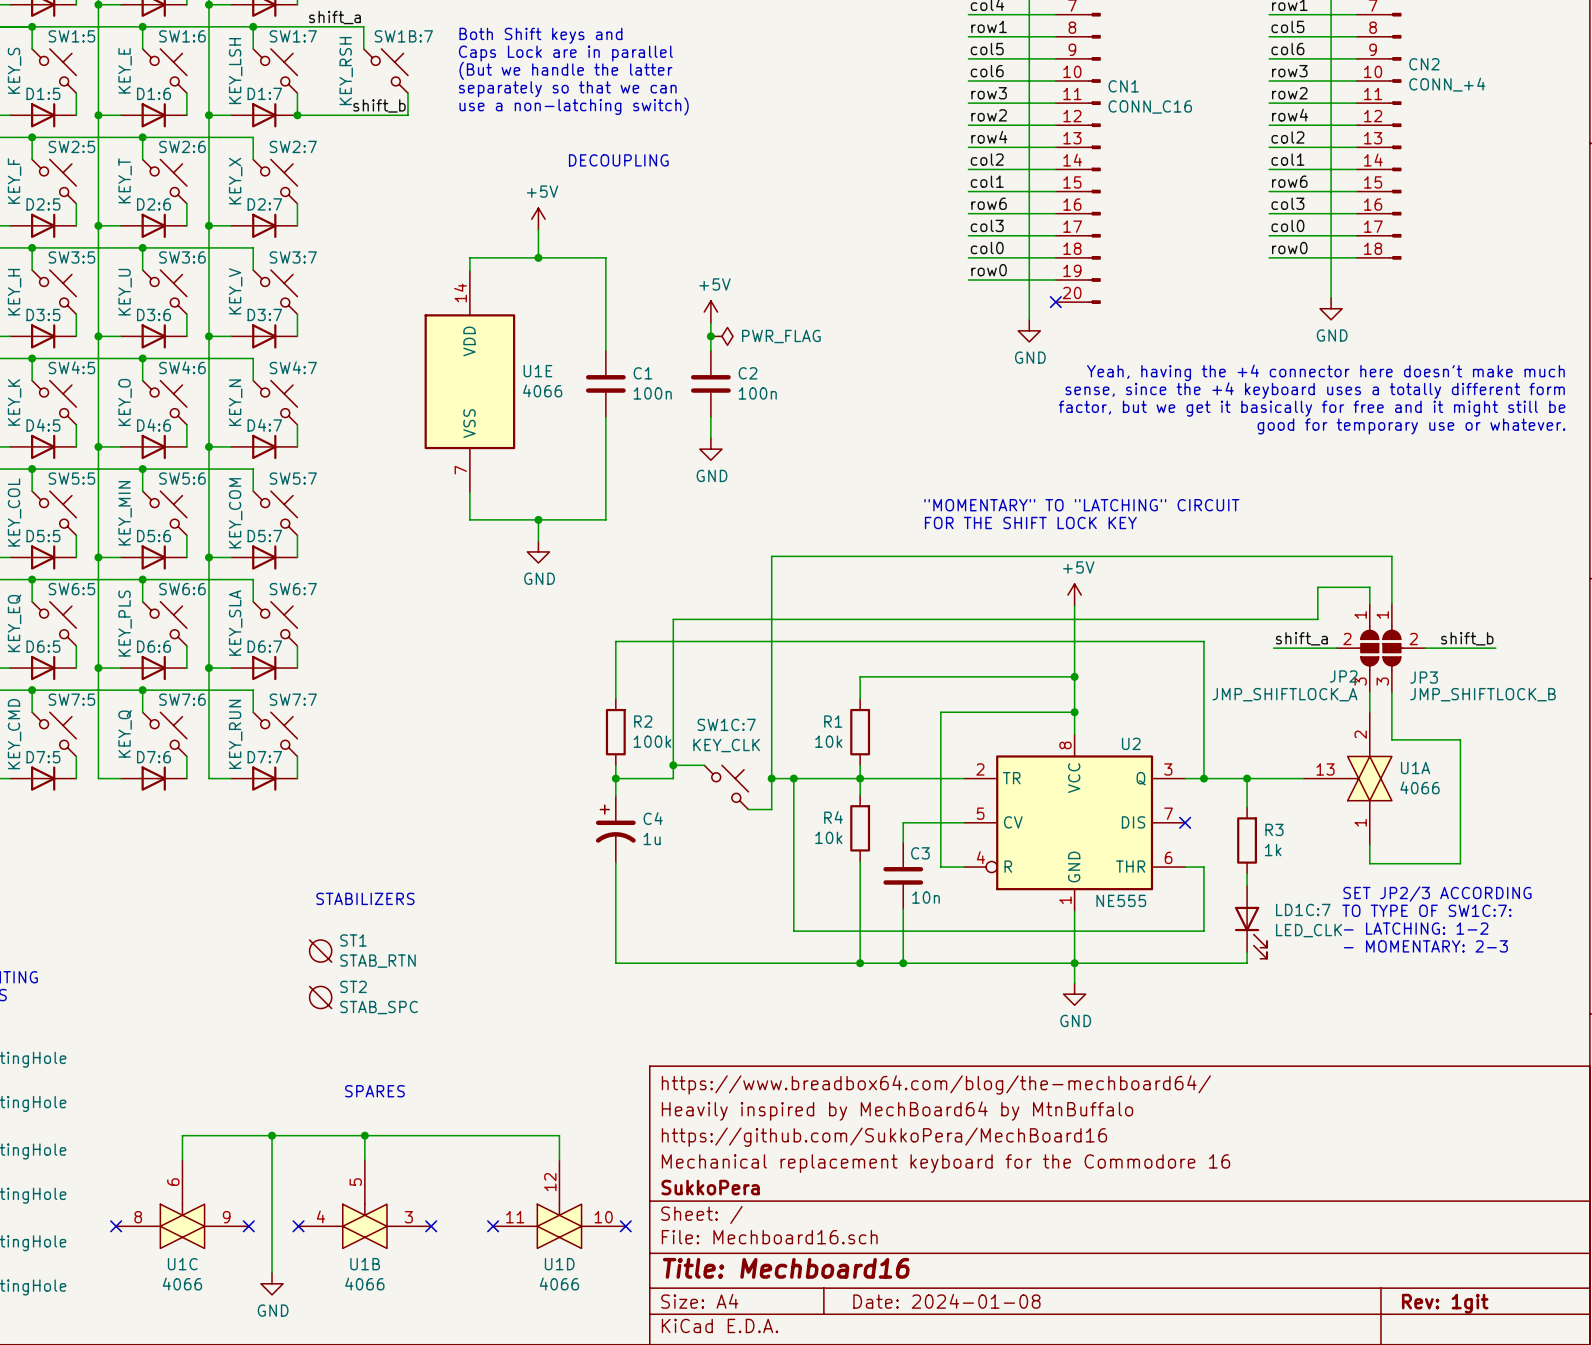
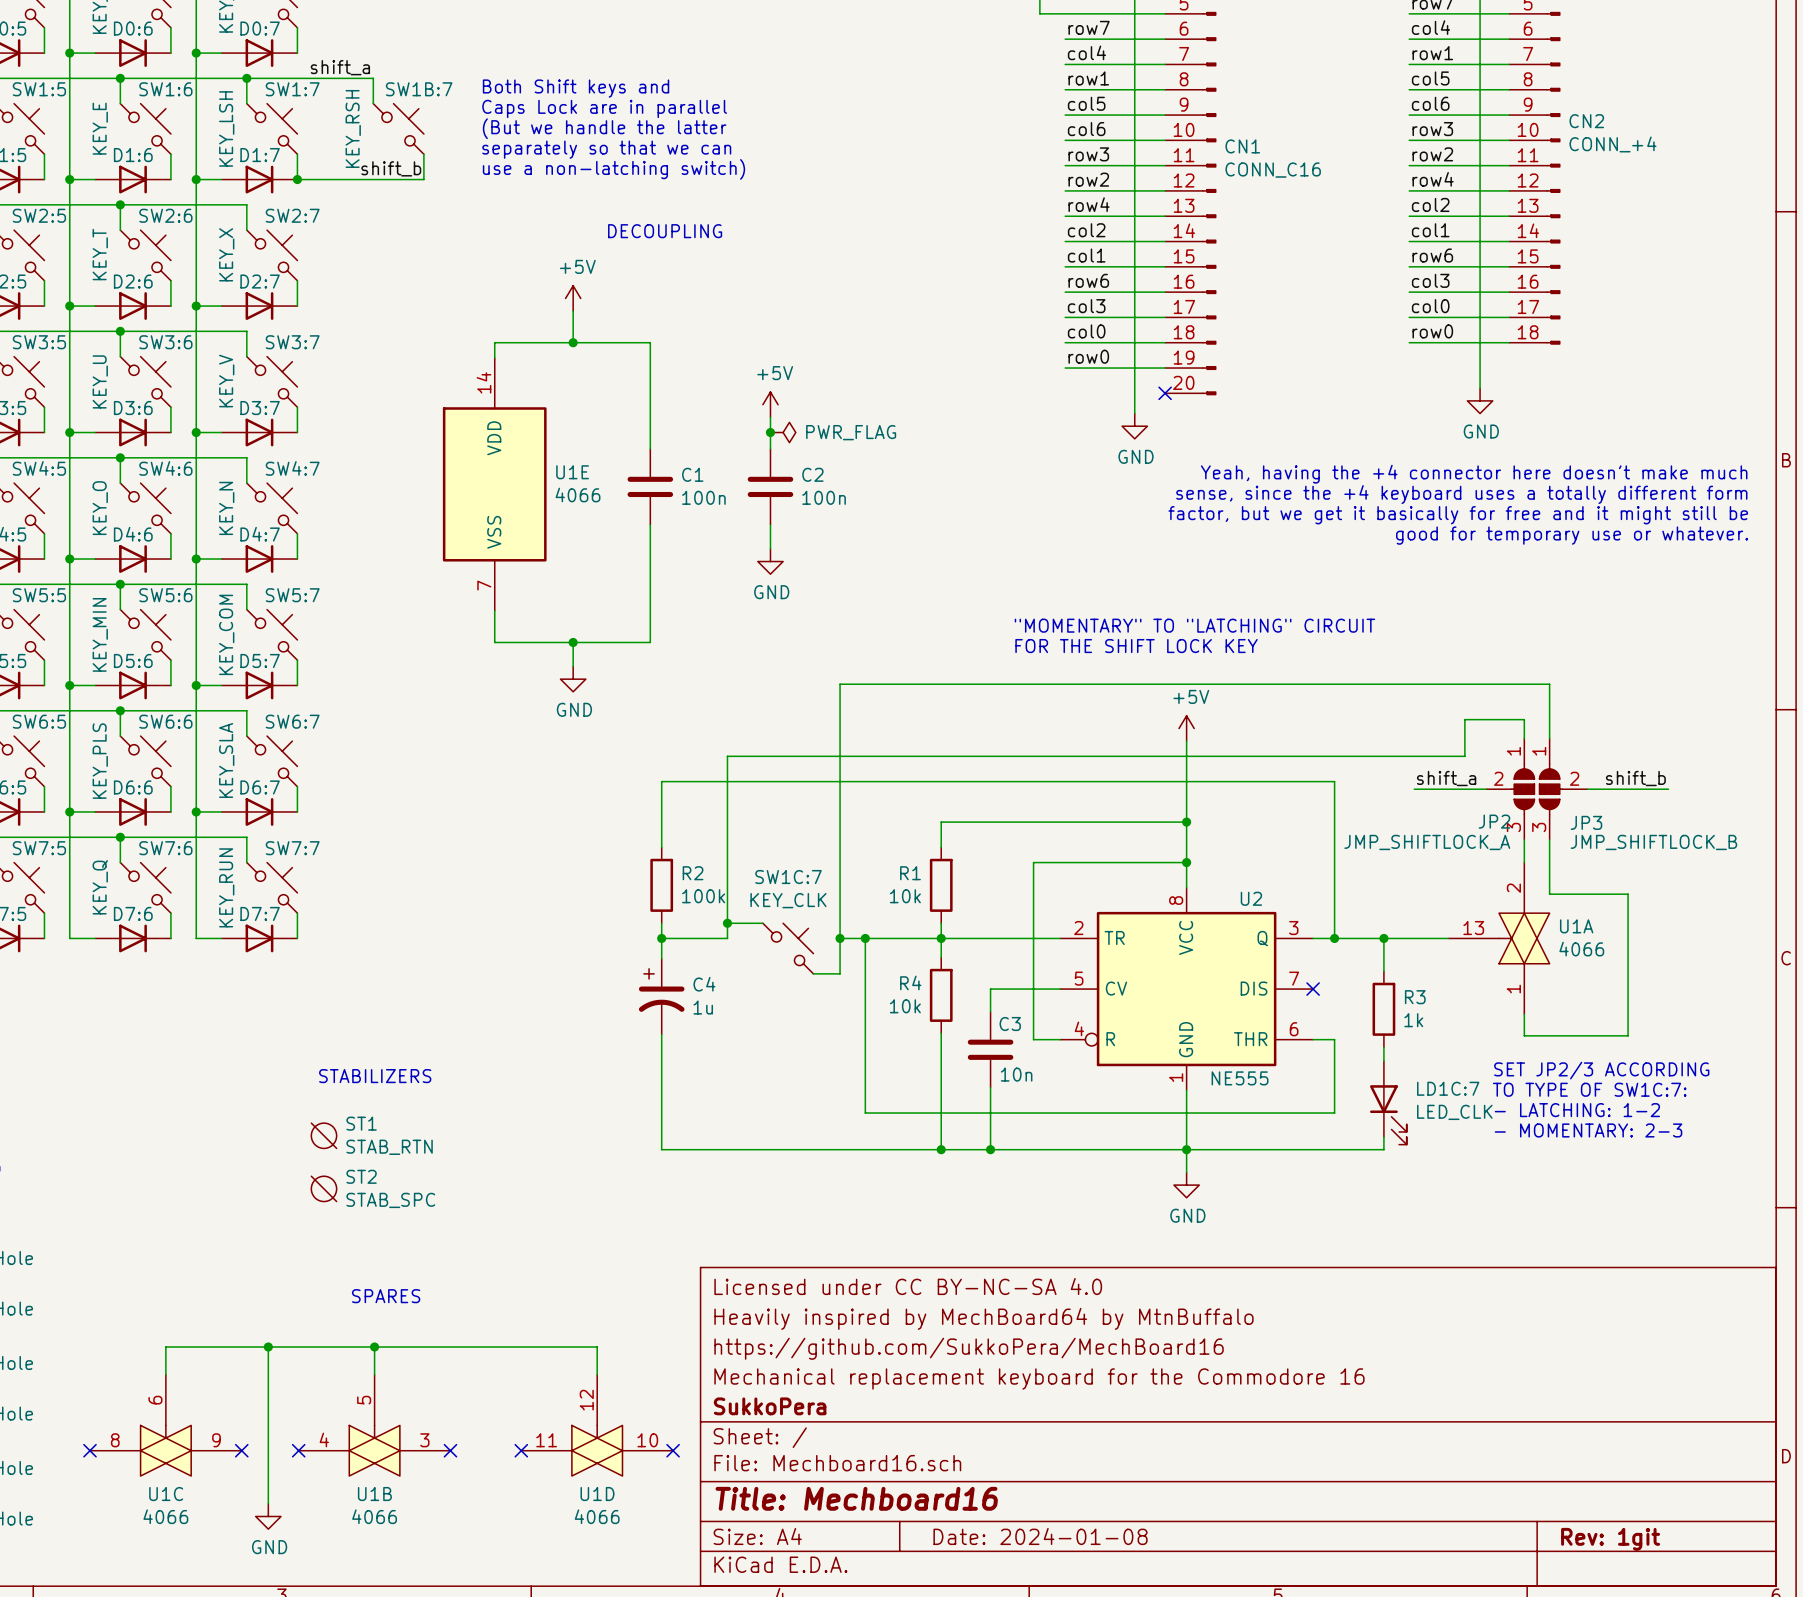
title block: https://www.breadbox64.com/blog/the-mechboard64/ (936, 1084) -> Licensed under CC BY-NC-SA 4.0 (908, 1286)

